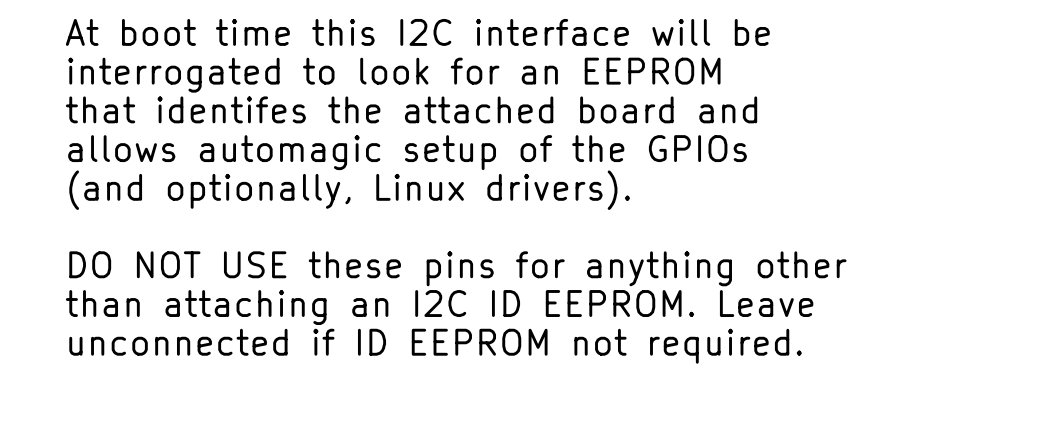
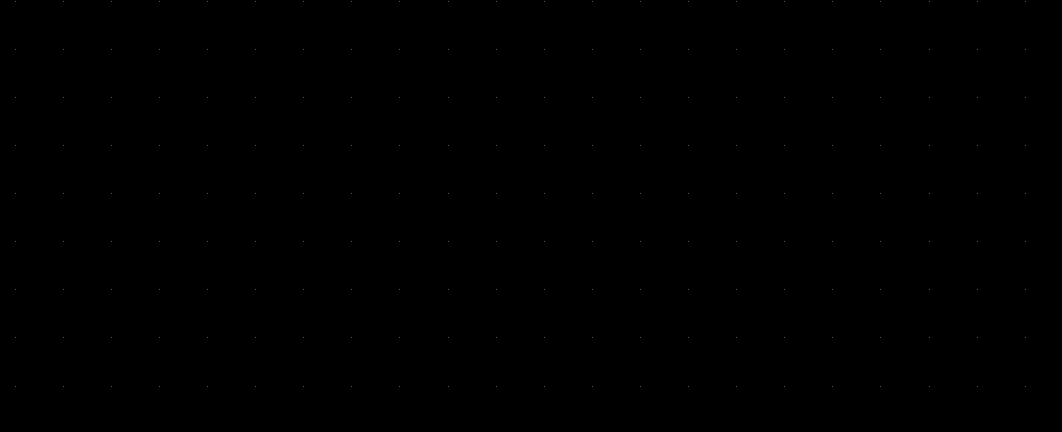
text: At boot time this I2C interface will be (417, 32) -> none
text: interrogated to look for an EEPROM (394, 75) -> none
text: that identifes the attached board and (411, 109) -> none
text: allows automagic setup of the GPIOs (407, 152) -> none
text: (and optionally, Linux drivers). (349, 190) -> none
text: DO NOT USE these pins for anything other (457, 268) -> none
text: than attaching an I2C ID EEPROM. Leave (439, 307) -> none
text: unconnected if ID EEPROM not required. (435, 346) -> none

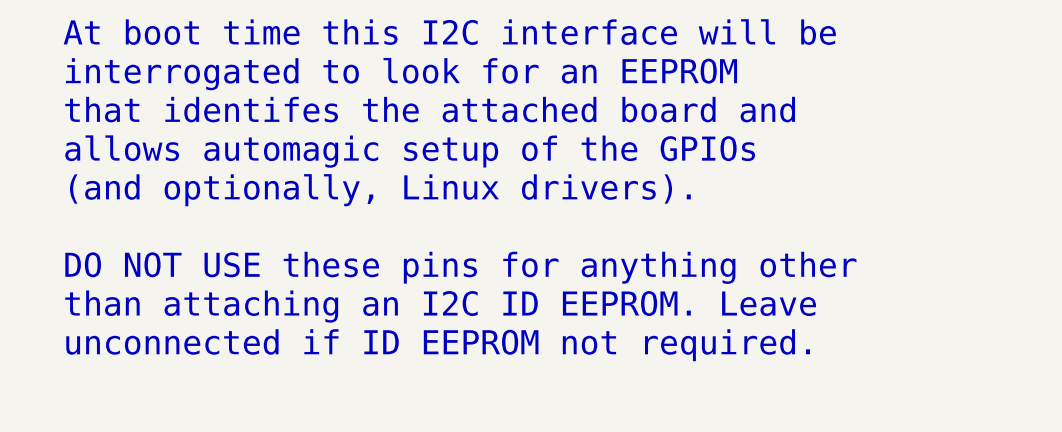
text: none -> At boot time this I2C interface will be (449, 32)
text: none -> interrogated to look for an EEPROM (401, 74)
text: none -> that identifes the attached board and (430, 109)
text: none -> allows automagic setup of the GPIOs (410, 151)
text: none -> (and optionally, Linux drivers). (380, 190)
text: none -> DO NOT USE these pins for anything other (460, 267)
text: none -> than attaching an I2C ID EEPROM. Leave (440, 306)
text: none -> unconnected if ID EEPROM not required. (438, 345)

